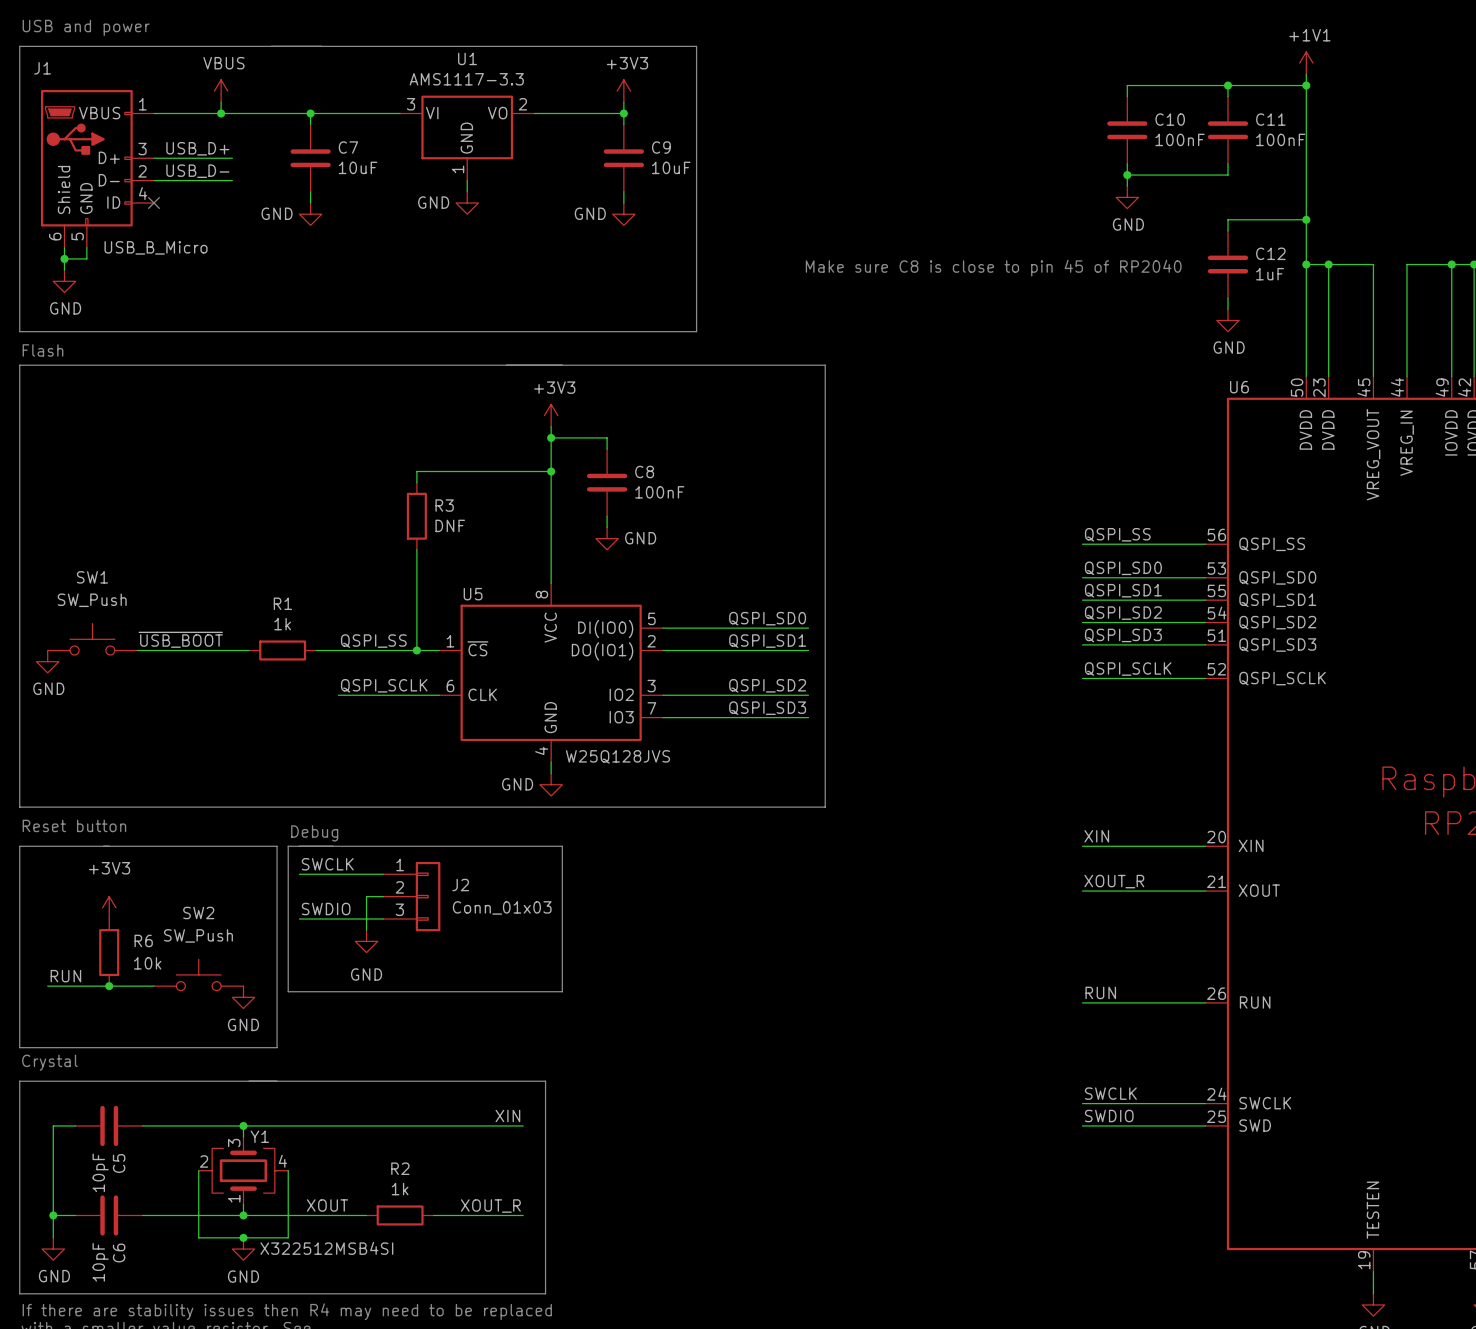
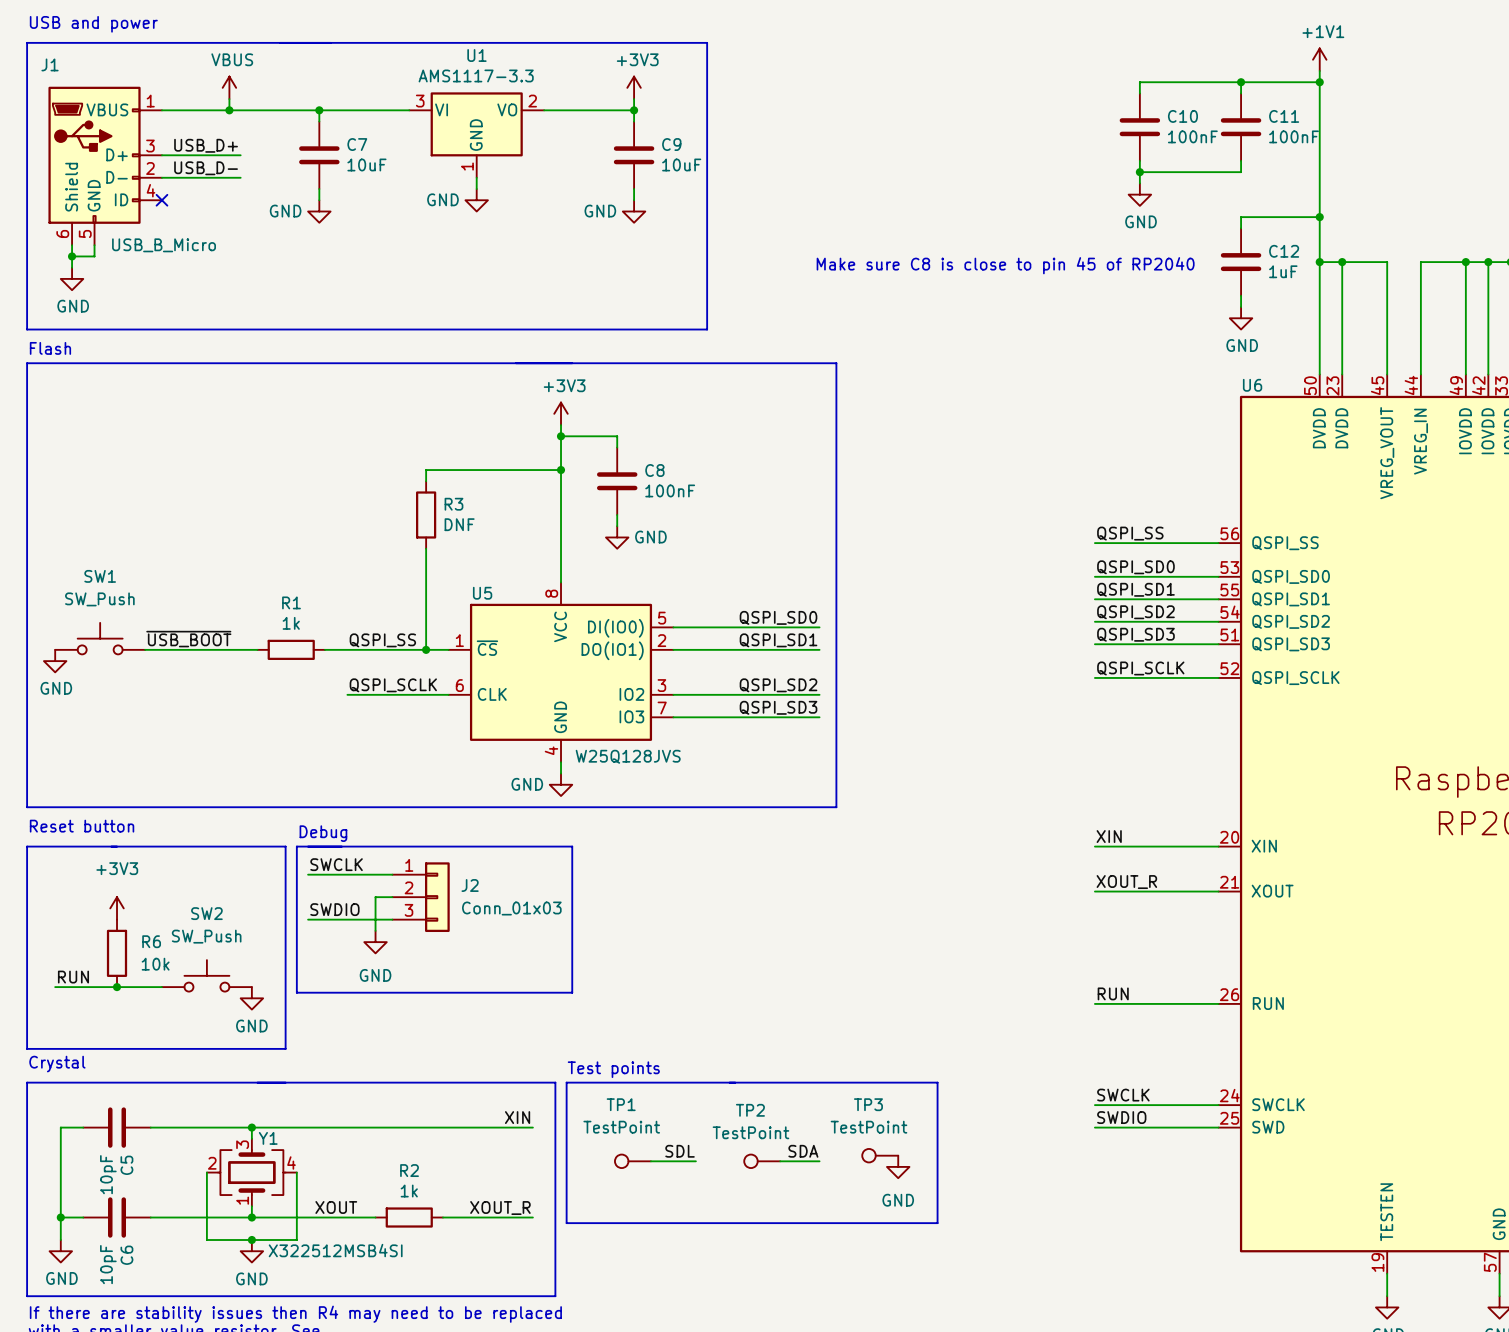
text: none -> Test points (613, 1069)
line: none -> (566, 1082) (566, 1223) (937, 1223) (937, 1082) (566, 1082)
label: none -> SDL (680, 1151)
label: none -> SDA (803, 1151)
TP3: none -> TestPoint (880, 1155)
TP1: none -> TestPoint (632, 1161)
wire: none -> (650, 1161) (695, 1161)
TP2: none -> TestPoint (762, 1161)
wire: none -> (780, 1161) (819, 1161)
power symbol: none -> GND (898, 1166)

